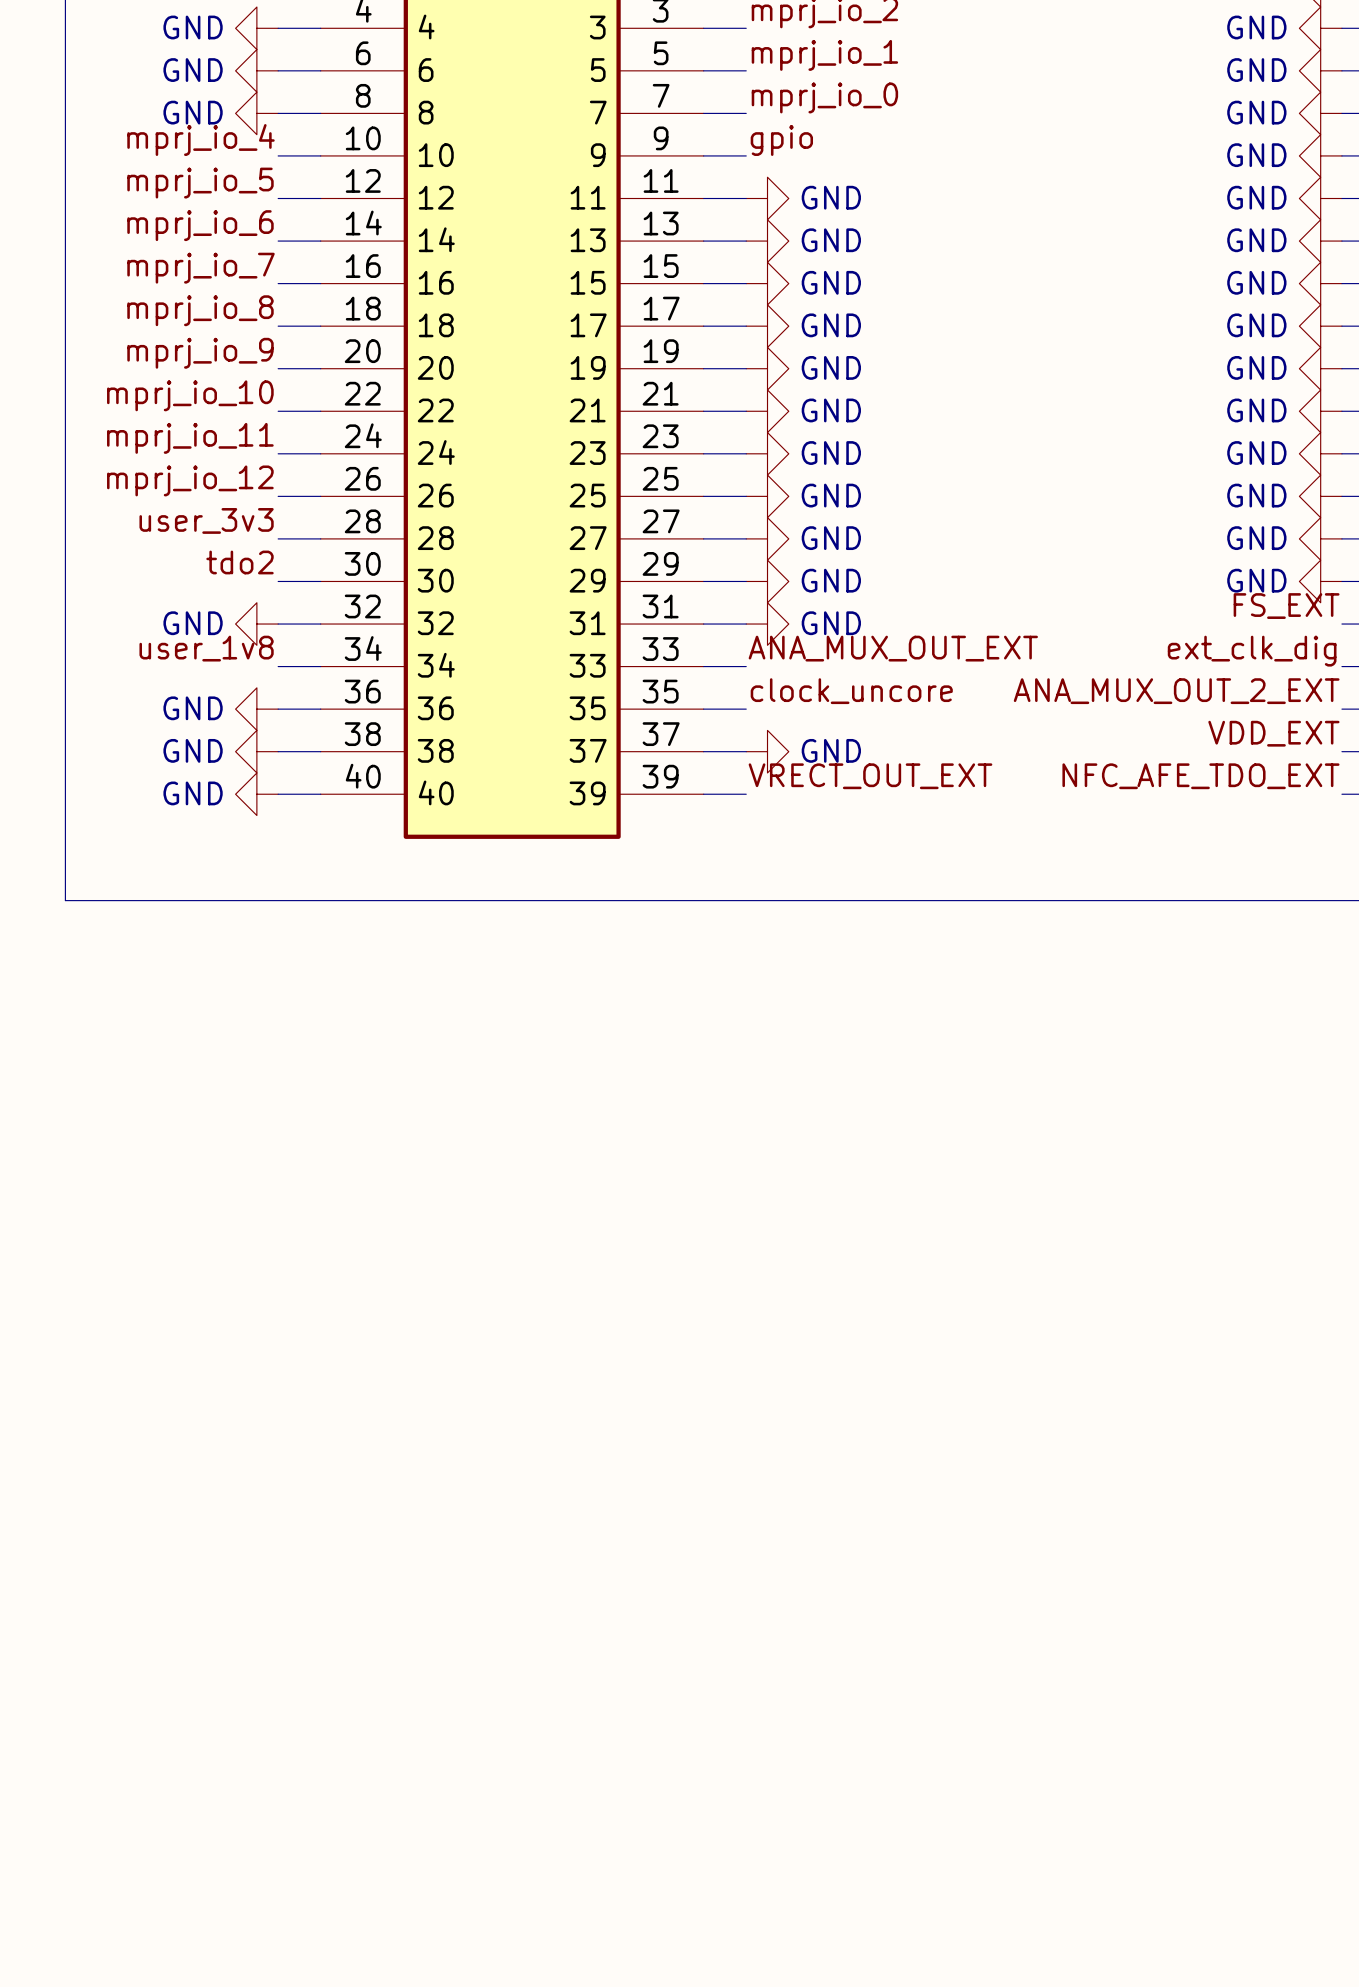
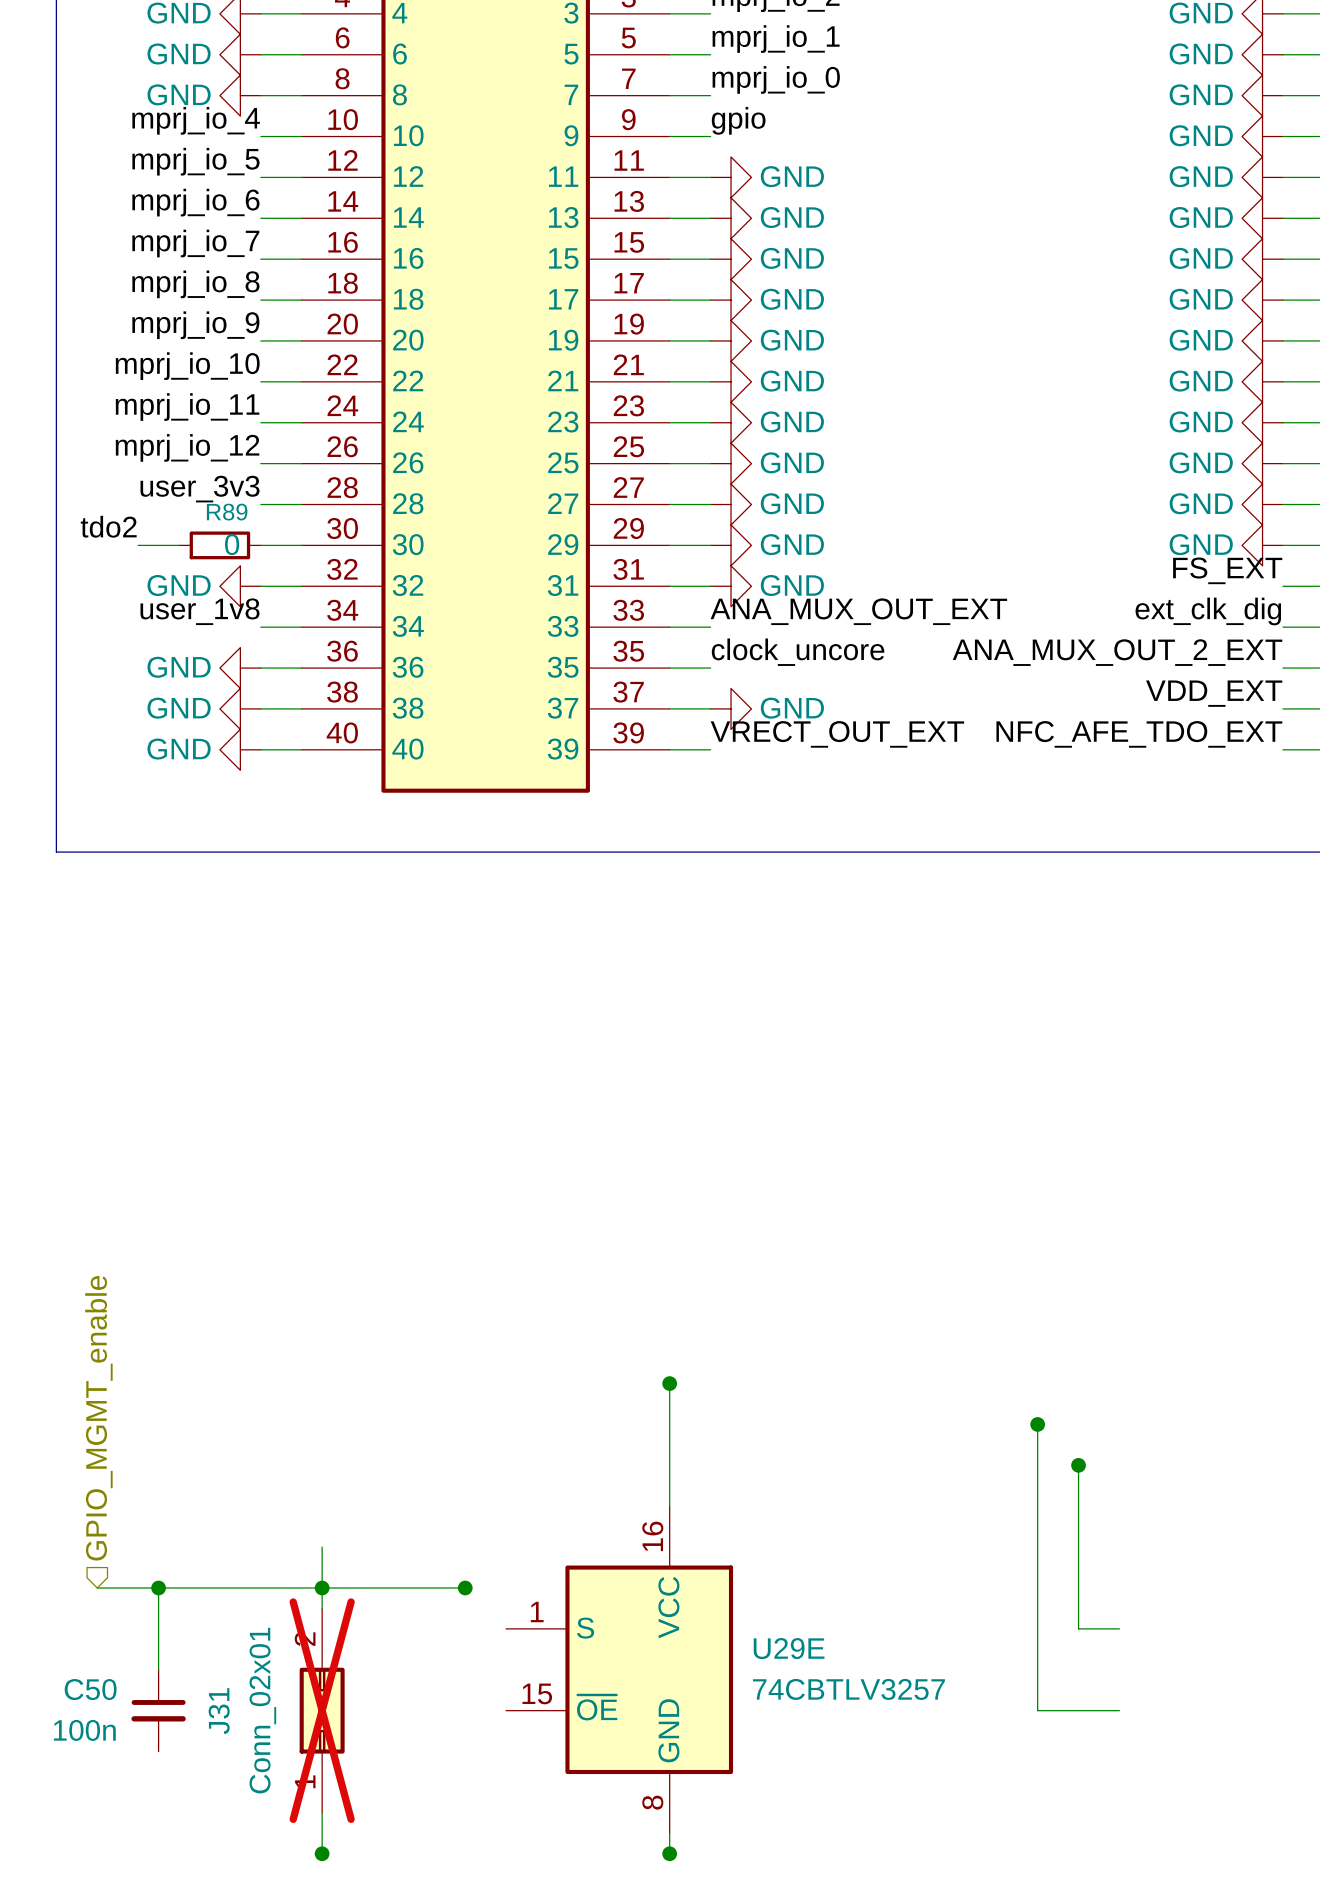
label position: tdo2 (240, 562) -> tdo2 (108, 526)
wire: none -> (138, 545) (179, 545)
R89: none -> 0 (219, 545)
wire: none -> (669, 1383) (669, 1506)
junction: none -> (669, 1383)
hierarchical label: none -> GPIO_MGMT_enable (98, 1418)
wire: none -> (1037, 1424) (1037, 1710) (1119, 1710)
junction: none -> (1037, 1424)
wire: none -> (1078, 1465) (1078, 1628) (1119, 1628)
junction: none -> (1078, 1465)
wire: none -> (322, 1547) (322, 1608)
wire: none -> (97, 1588) (465, 1588)
wire: none -> (158, 1588) (158, 1669)
junction: none -> (158, 1588)
junction: none -> (322, 1588)
junction: none -> (465, 1588)
U29E: none -> 74CBTLV3257 (619, 1669)
C50: none -> 100n (158, 1710)
J31: none -> Conn_02x01 (322, 1710)
wire: none -> (322, 1812) (322, 1853)
wire: none -> (669, 1833) (669, 1853)
junction: none -> (322, 1853)
junction: none -> (669, 1853)

